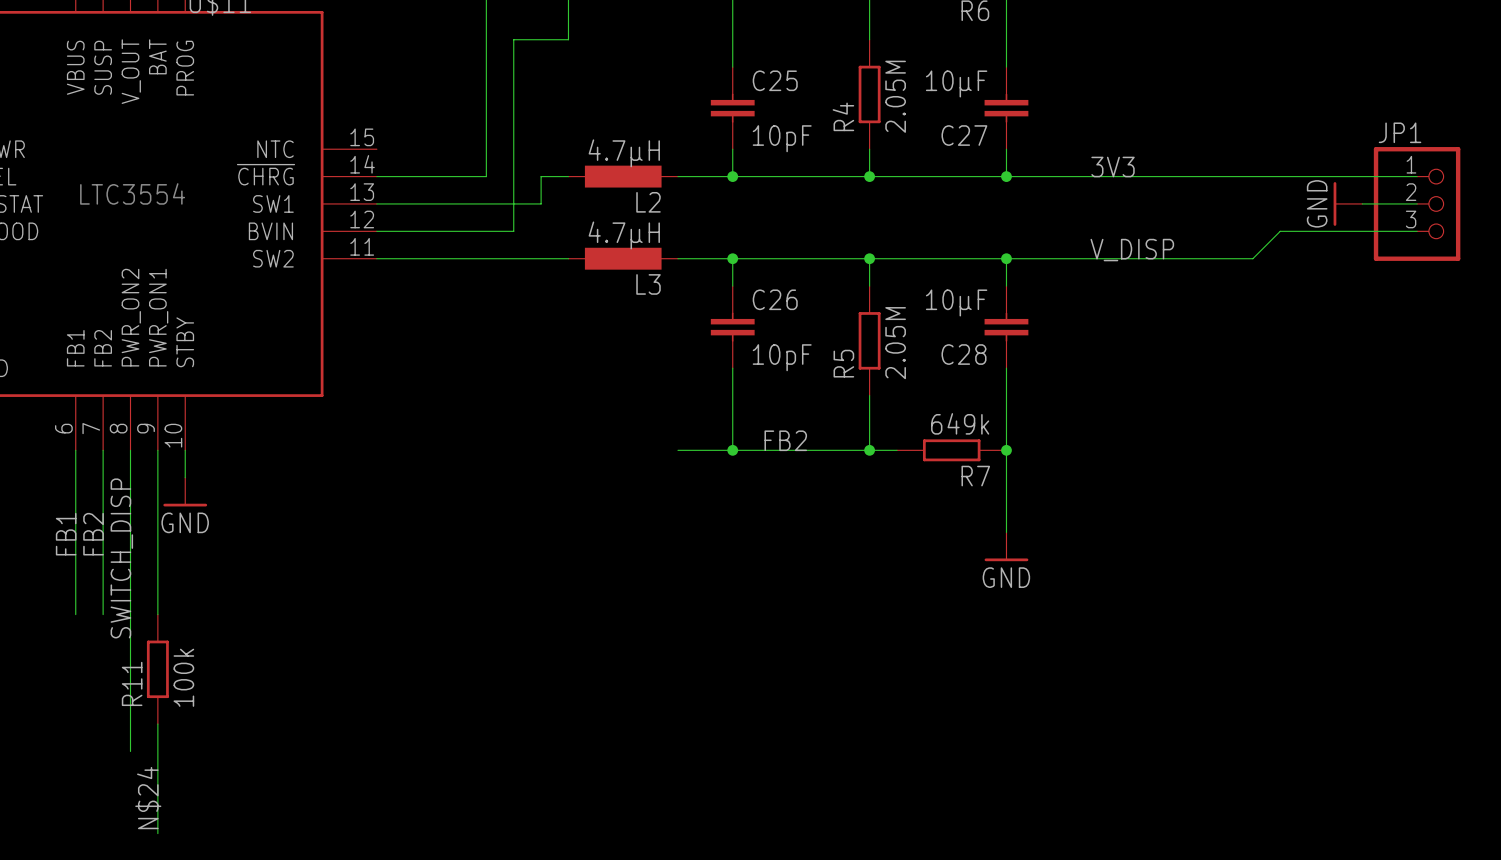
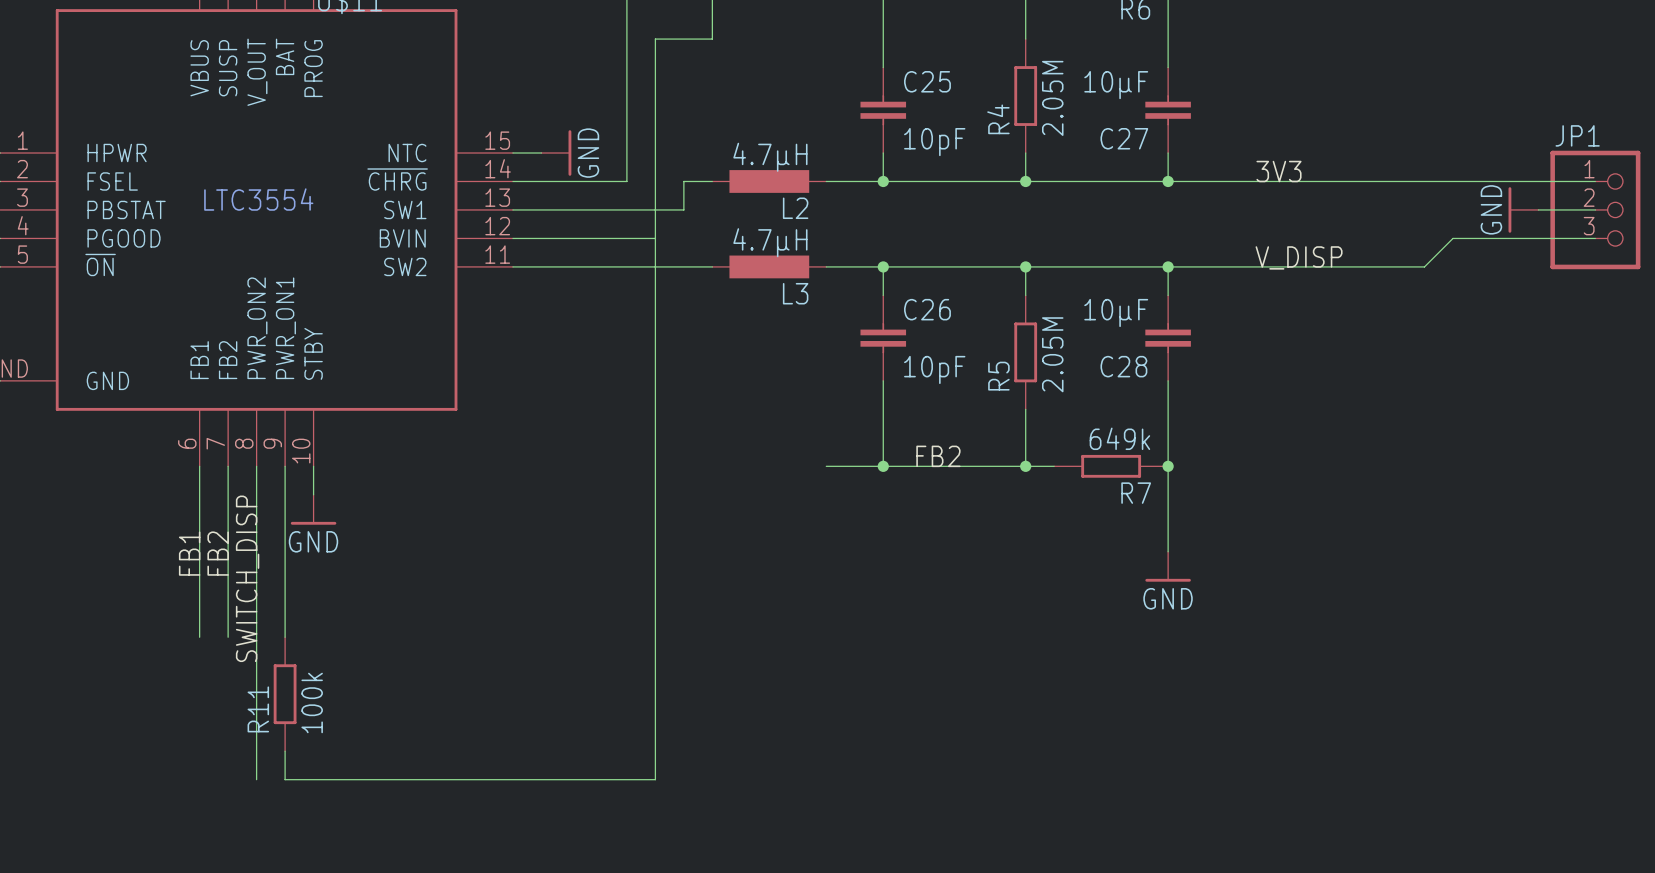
wire: none -> (512, 153) (541, 153)
power symbol: none -> GND (556, 153)
wire: (157, 751) (157, 833) -> (285, 779) (655, 779) (655, 238)
label: N$24 (148, 798) -> none

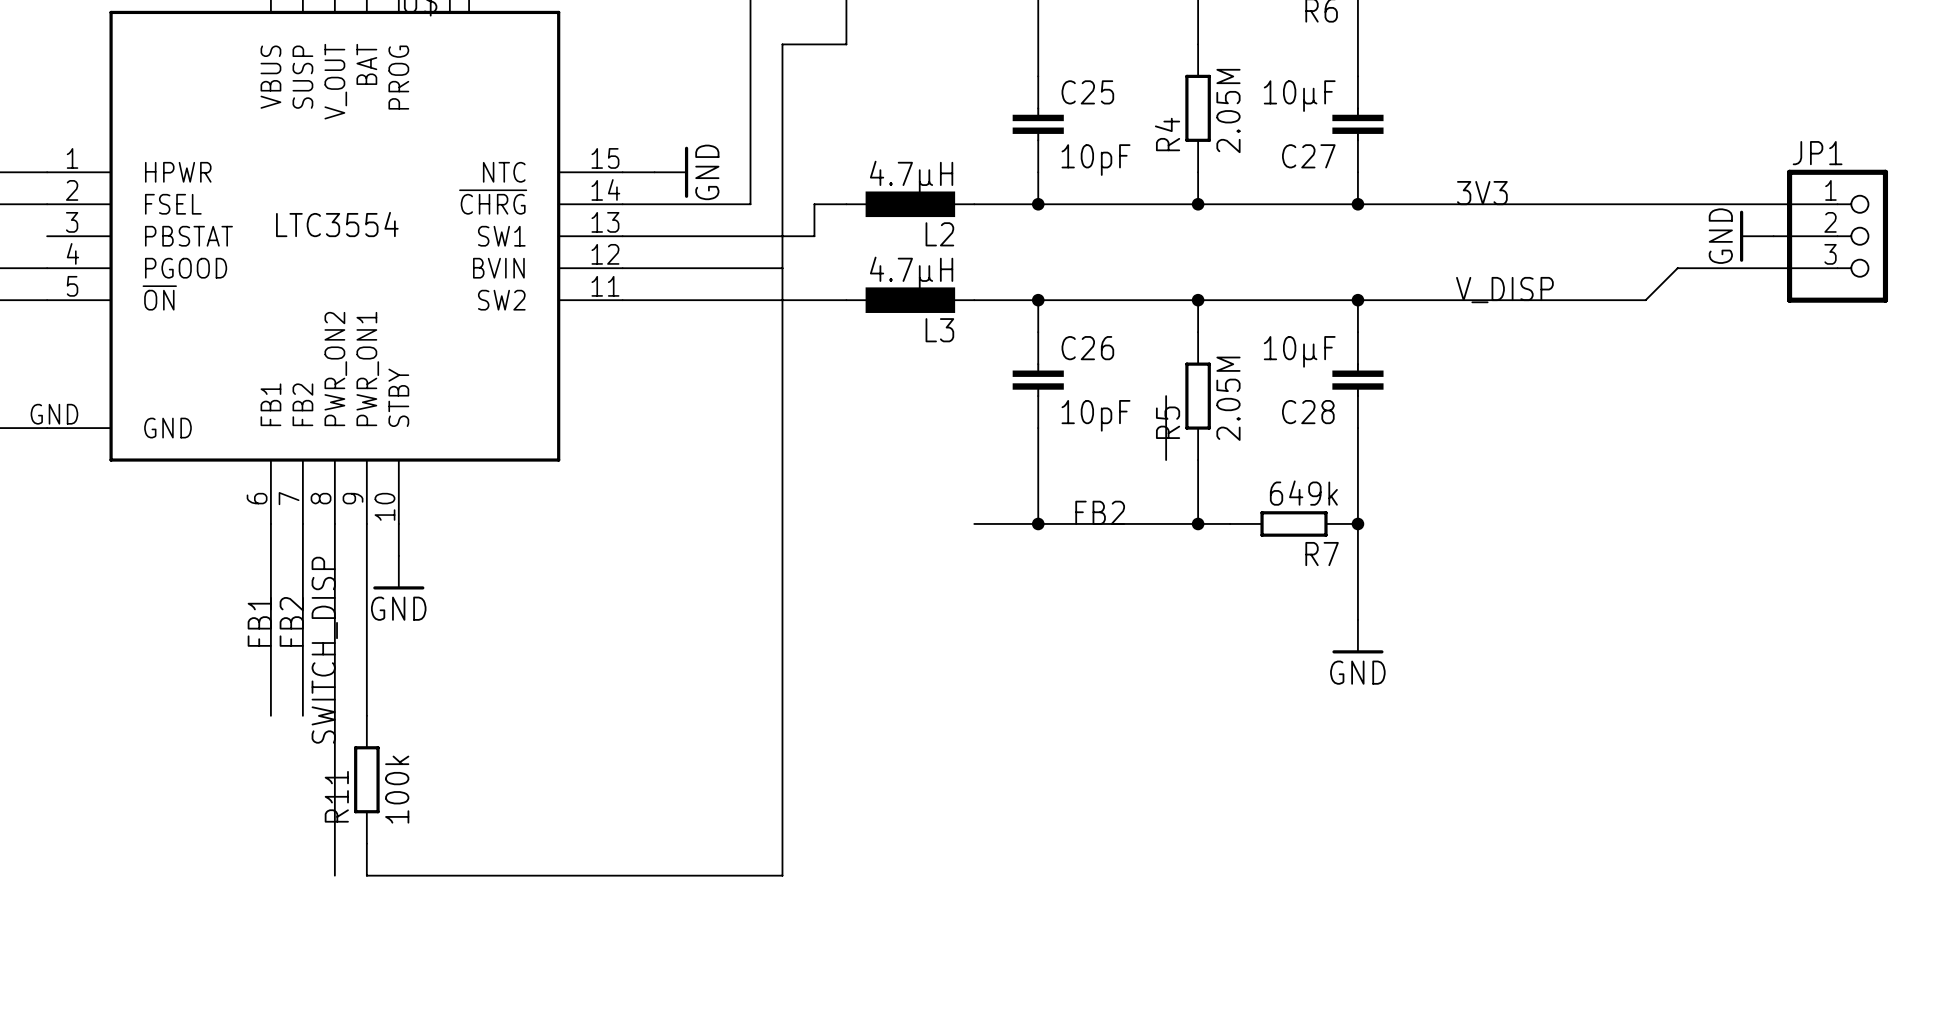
wire: none -> (1166, 396) (1166, 460)

